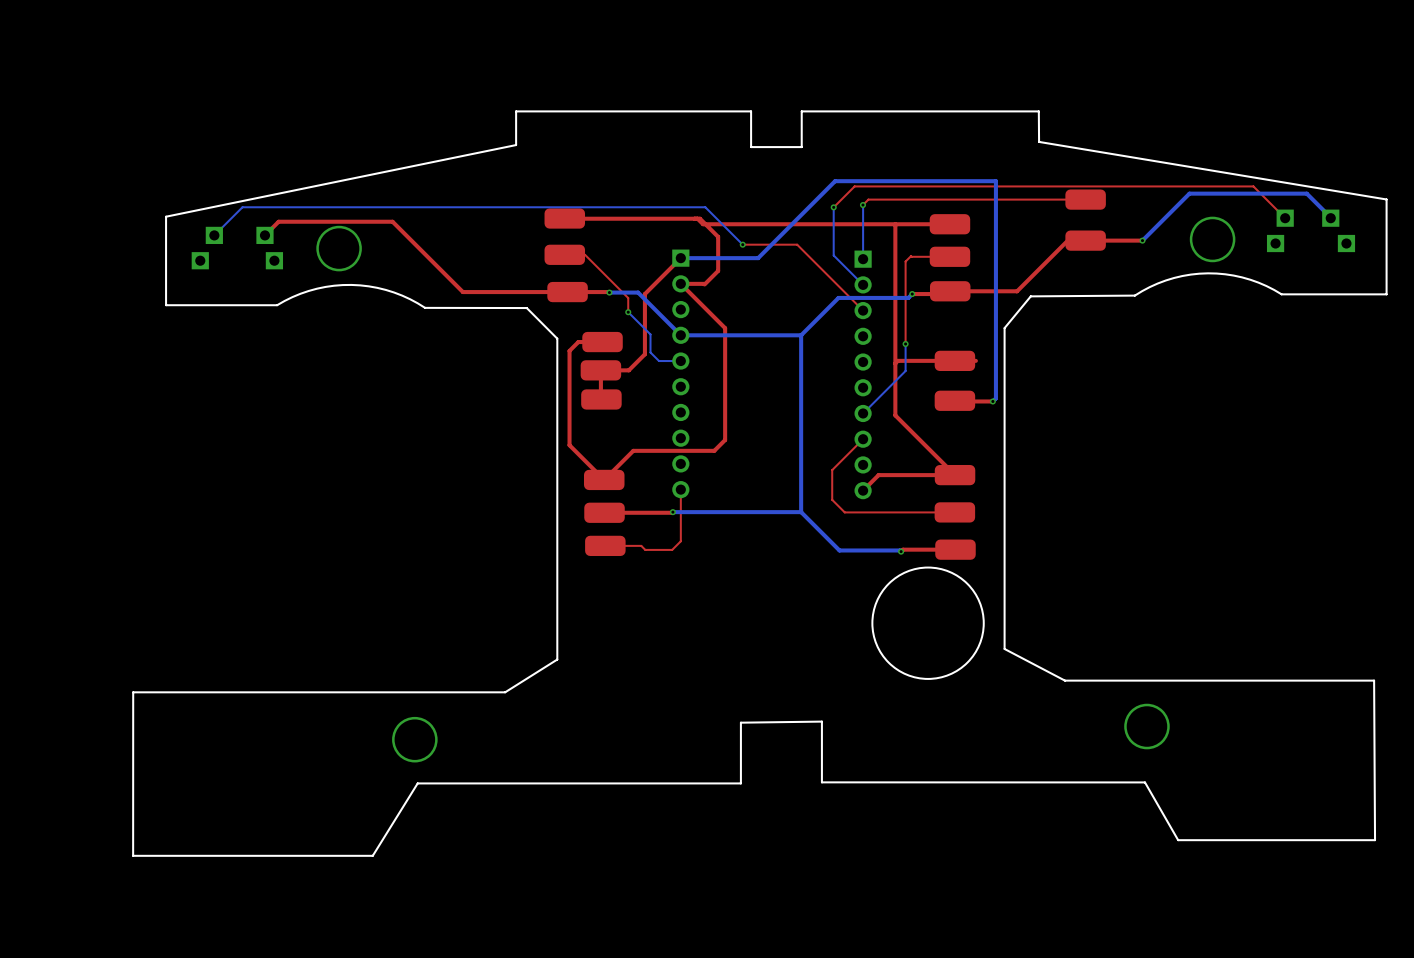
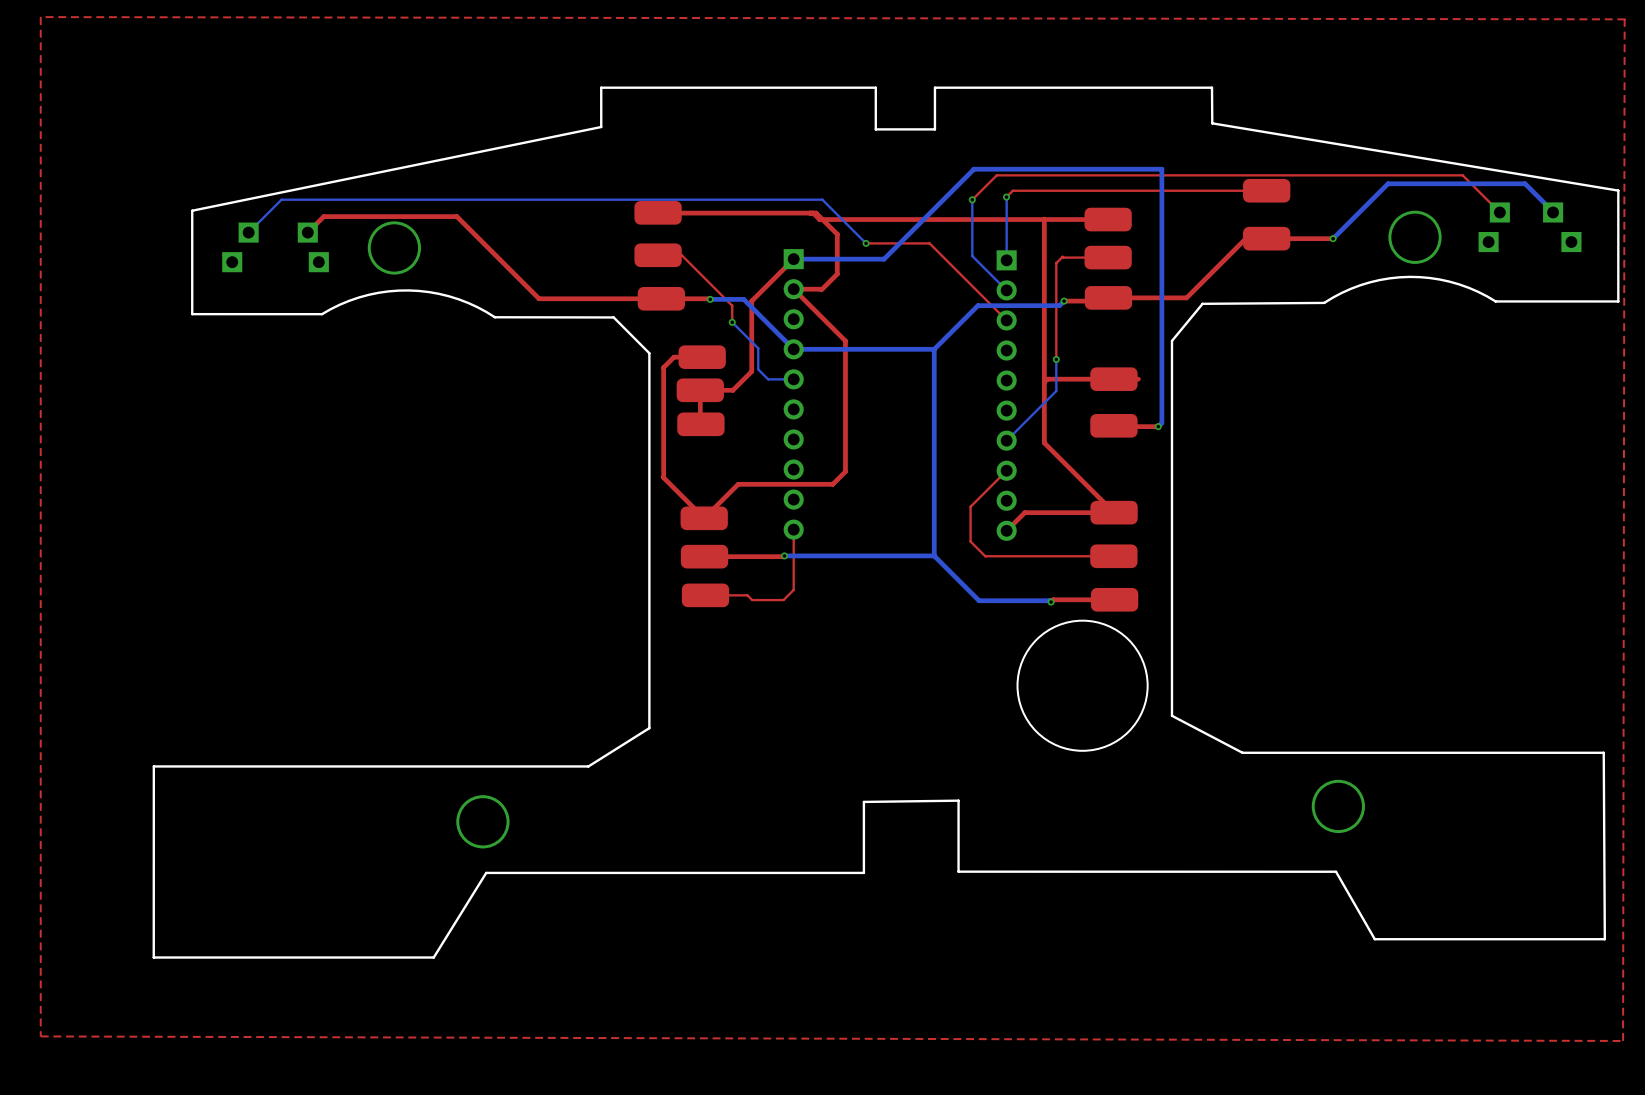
top zone outline: none -> (40, 17) (1625, 19) (1623, 1040) (40, 1036) (40, 17)

